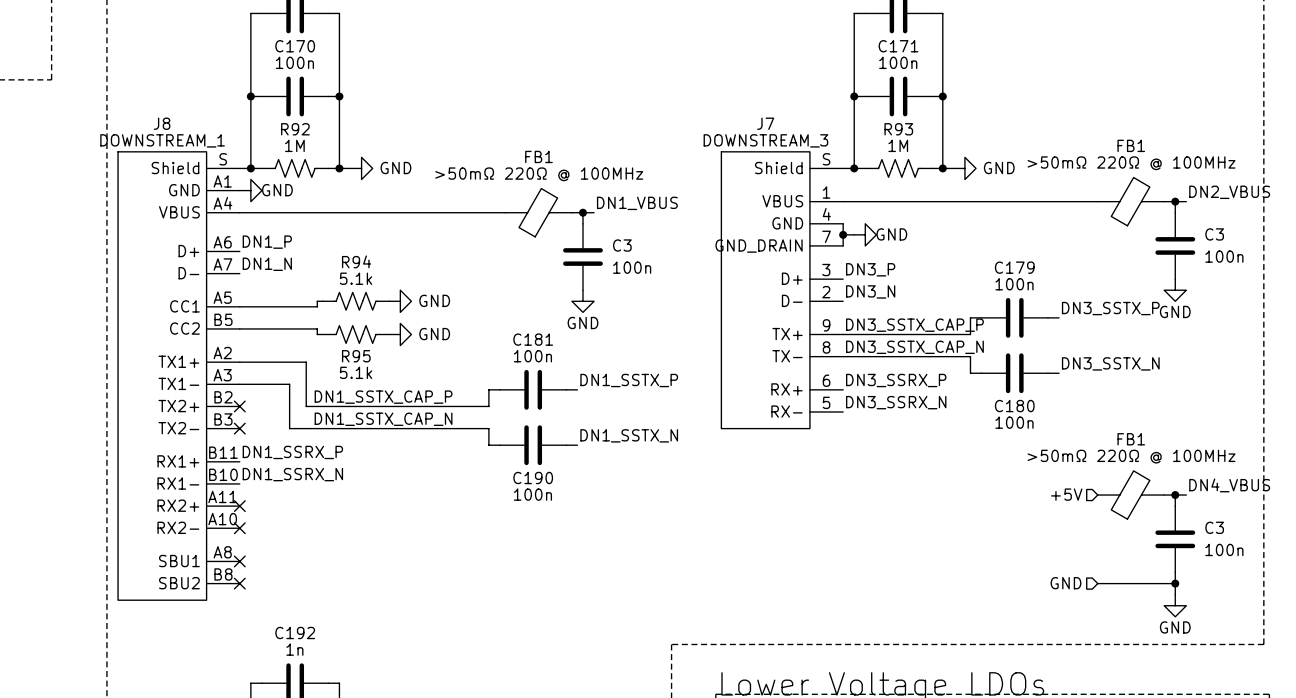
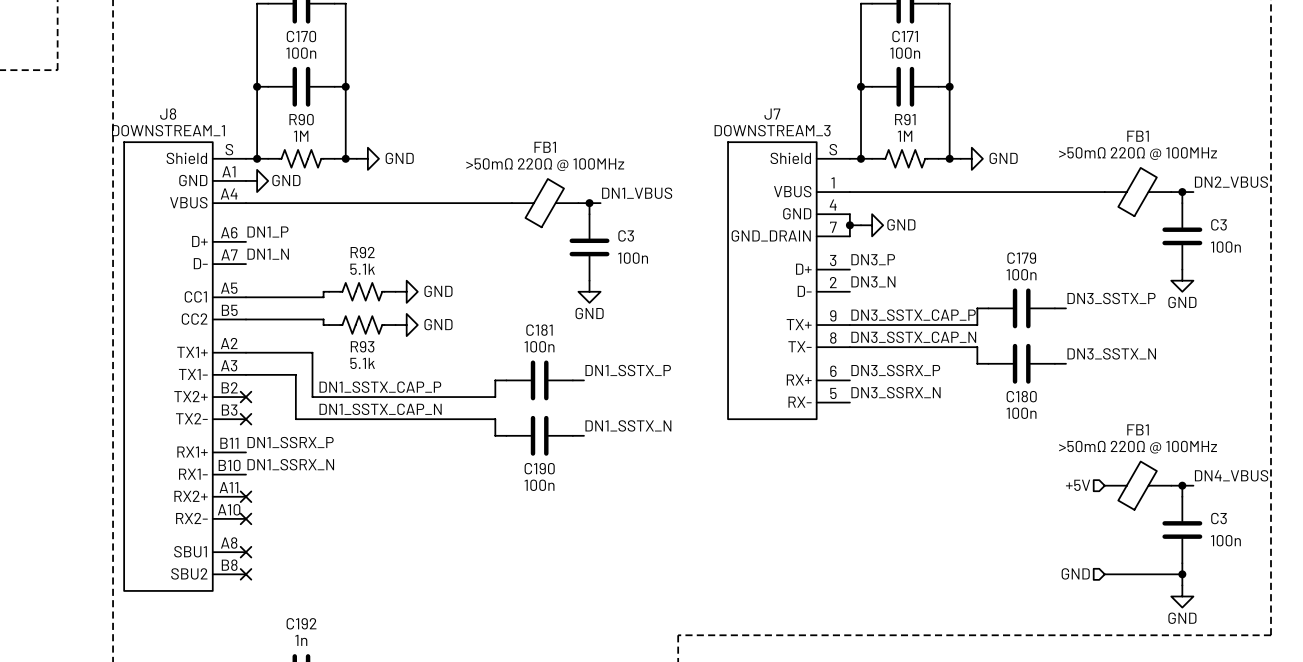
R92 name: R92 (295, 129) -> R90 (301, 119)
R93 name: R93 (898, 129) -> R91 (905, 119)
R94 name: R94 (356, 261) -> R92 (362, 252)
R95 name: R95 (356, 356) -> R93 (362, 346)

